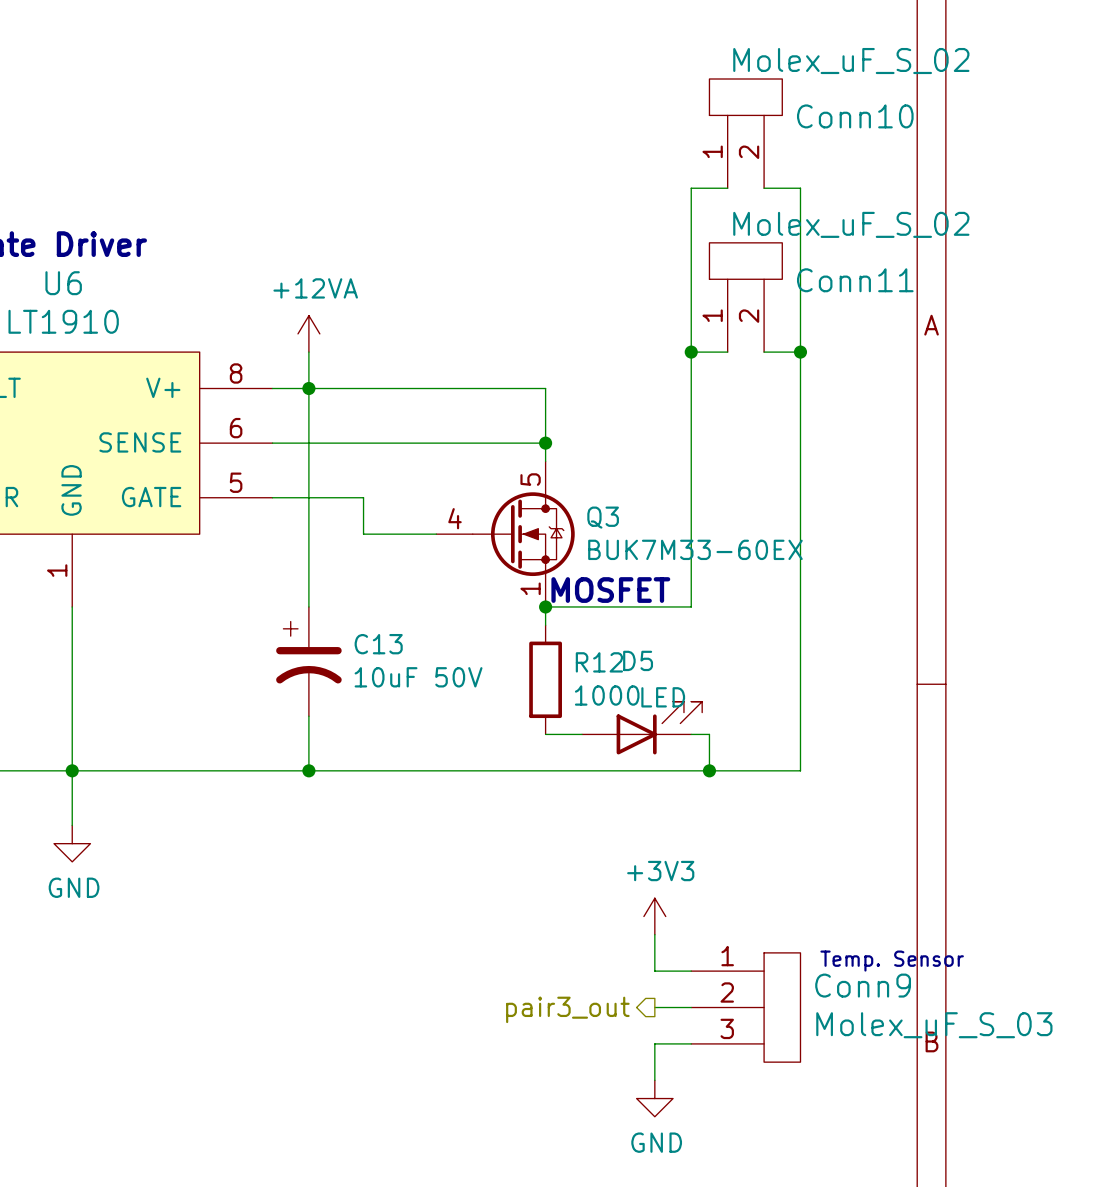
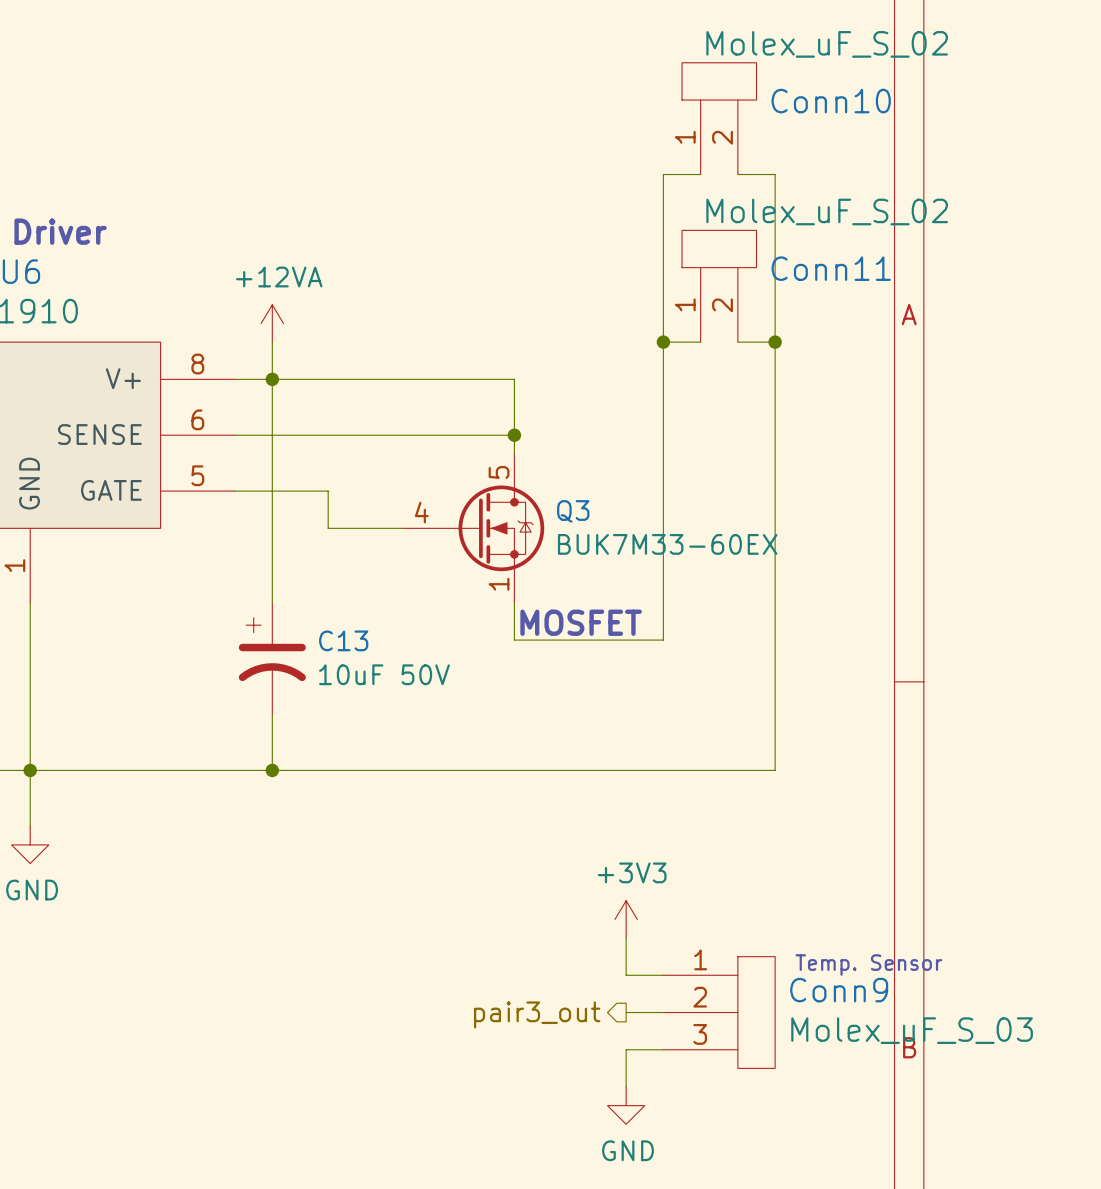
text position: MOSFET (610, 590) -> MOSFET (581, 622)
wire: (545, 606) (691, 606) -> (514, 621) (514, 640) (663, 640) (663, 602)
junction: (545, 606) -> none
R12: 1000 (545, 679) -> none
D5: LED (642, 728) -> none
wire: (545, 734) (582, 734) -> none
wire: (691, 734) (709, 734) (709, 770) -> none
junction: (709, 770) -> none

